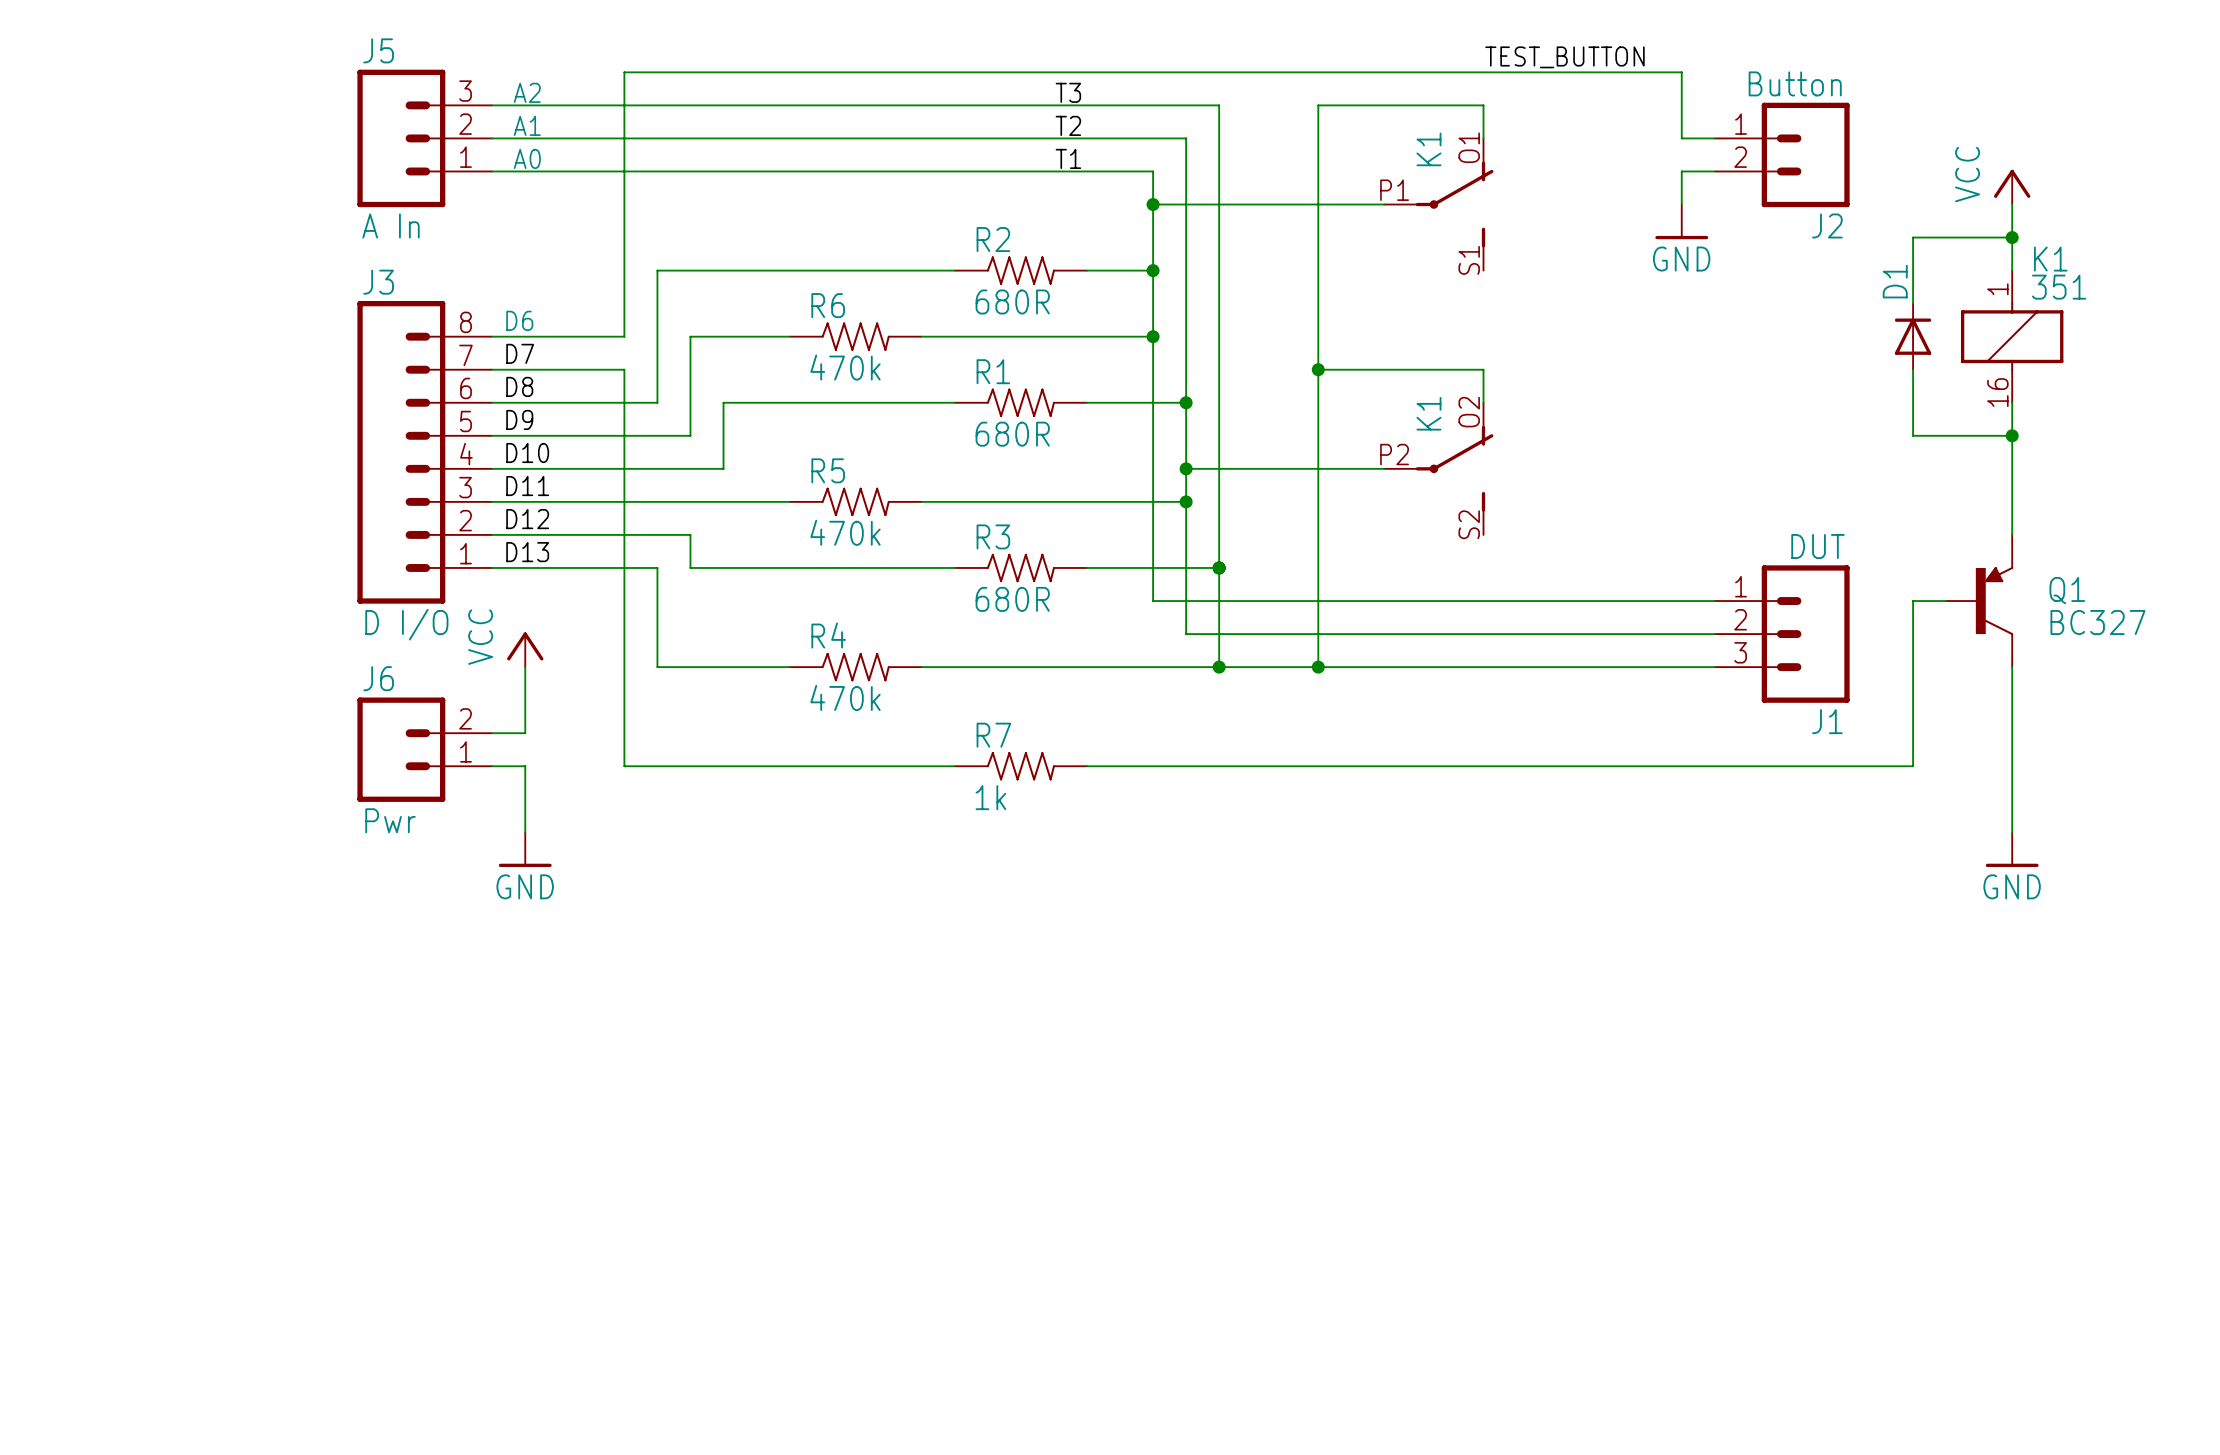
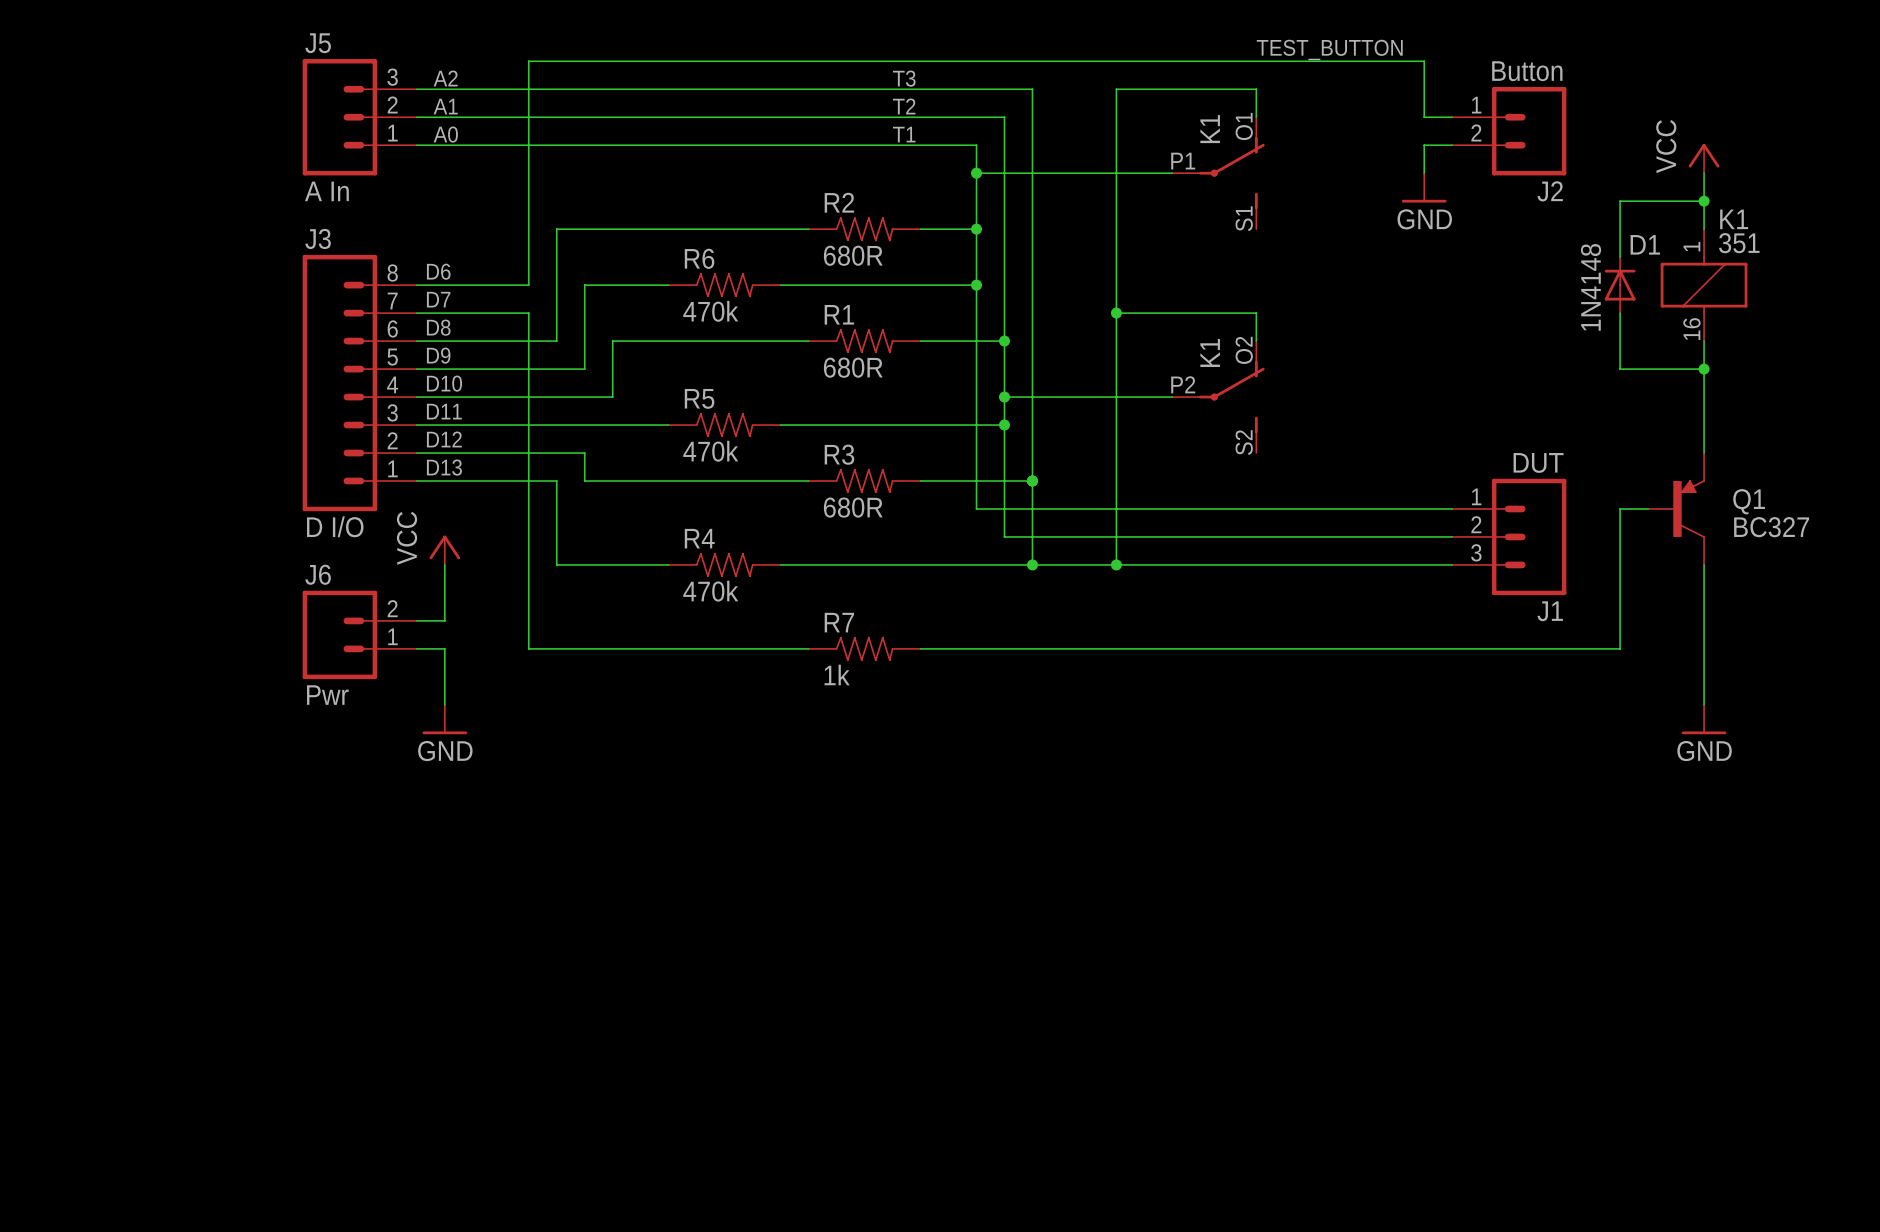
D1 name rotation: 0° (1895, 281) -> 90° clockwise (1645, 244)
D1 name position: D1 (1895, 281) -> D1 (1645, 244)
D1 value: none -> 1N4148 (1590, 287)

